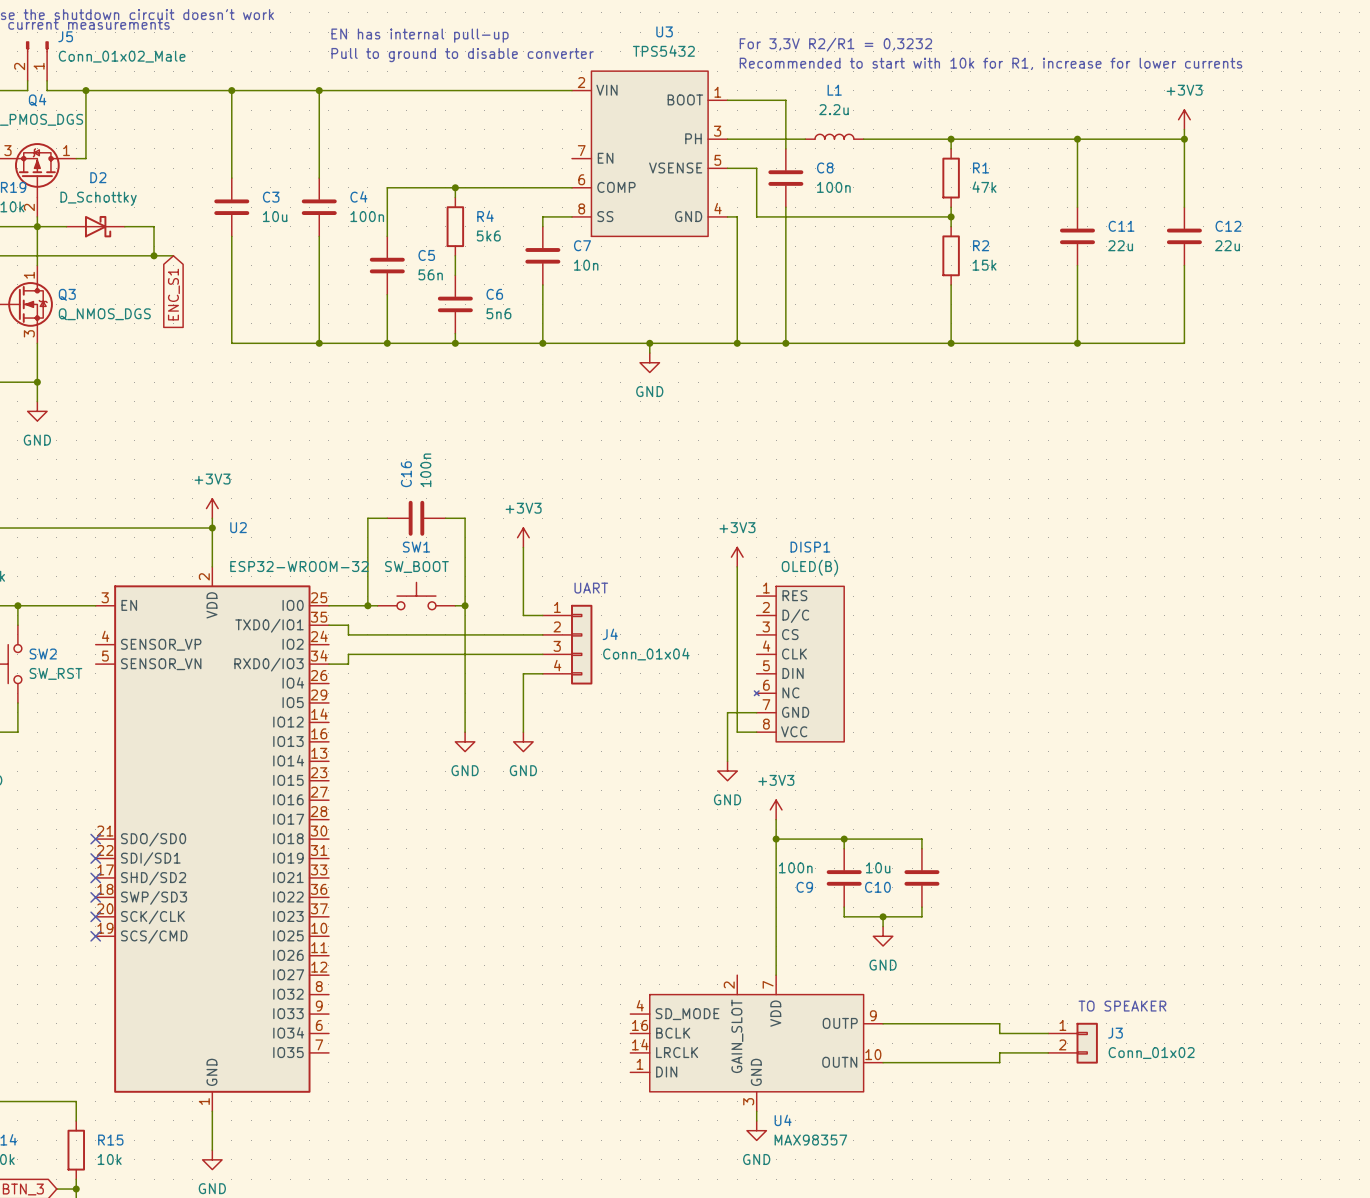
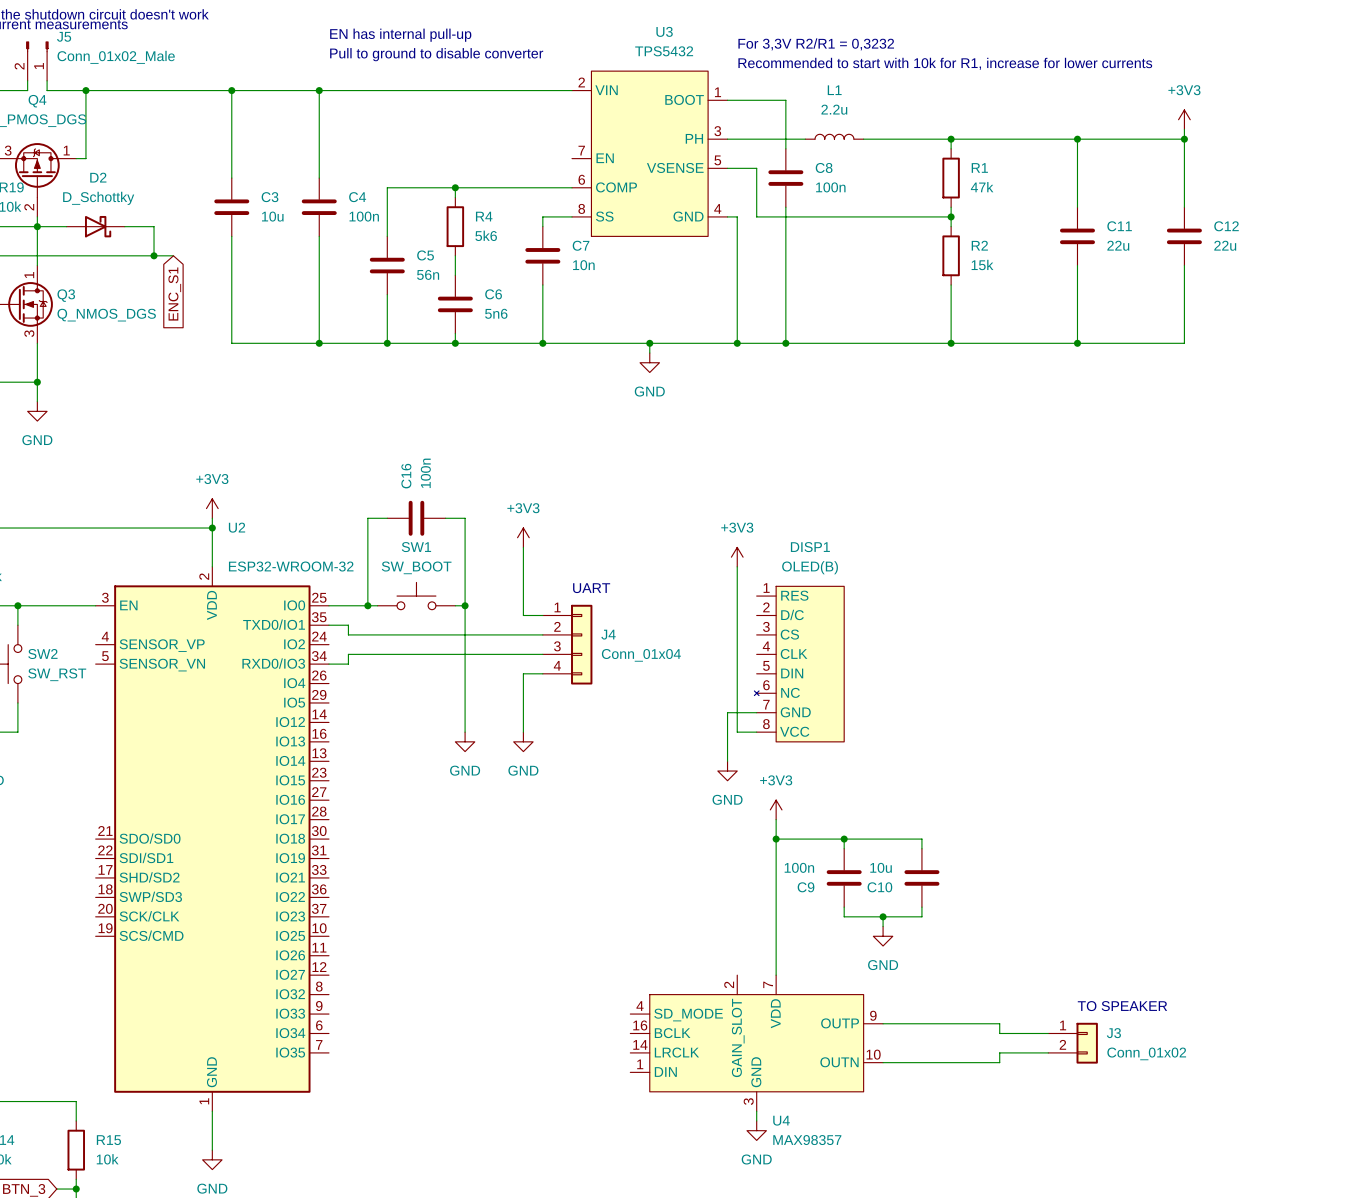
no-connect mark: (95, 839) -> none
no-connect mark: (95, 858) -> none
no-connect mark: (95, 877) -> none
no-connect mark: (95, 897) -> none
no-connect mark: (95, 916) -> none
no-connect mark: (95, 936) -> none

